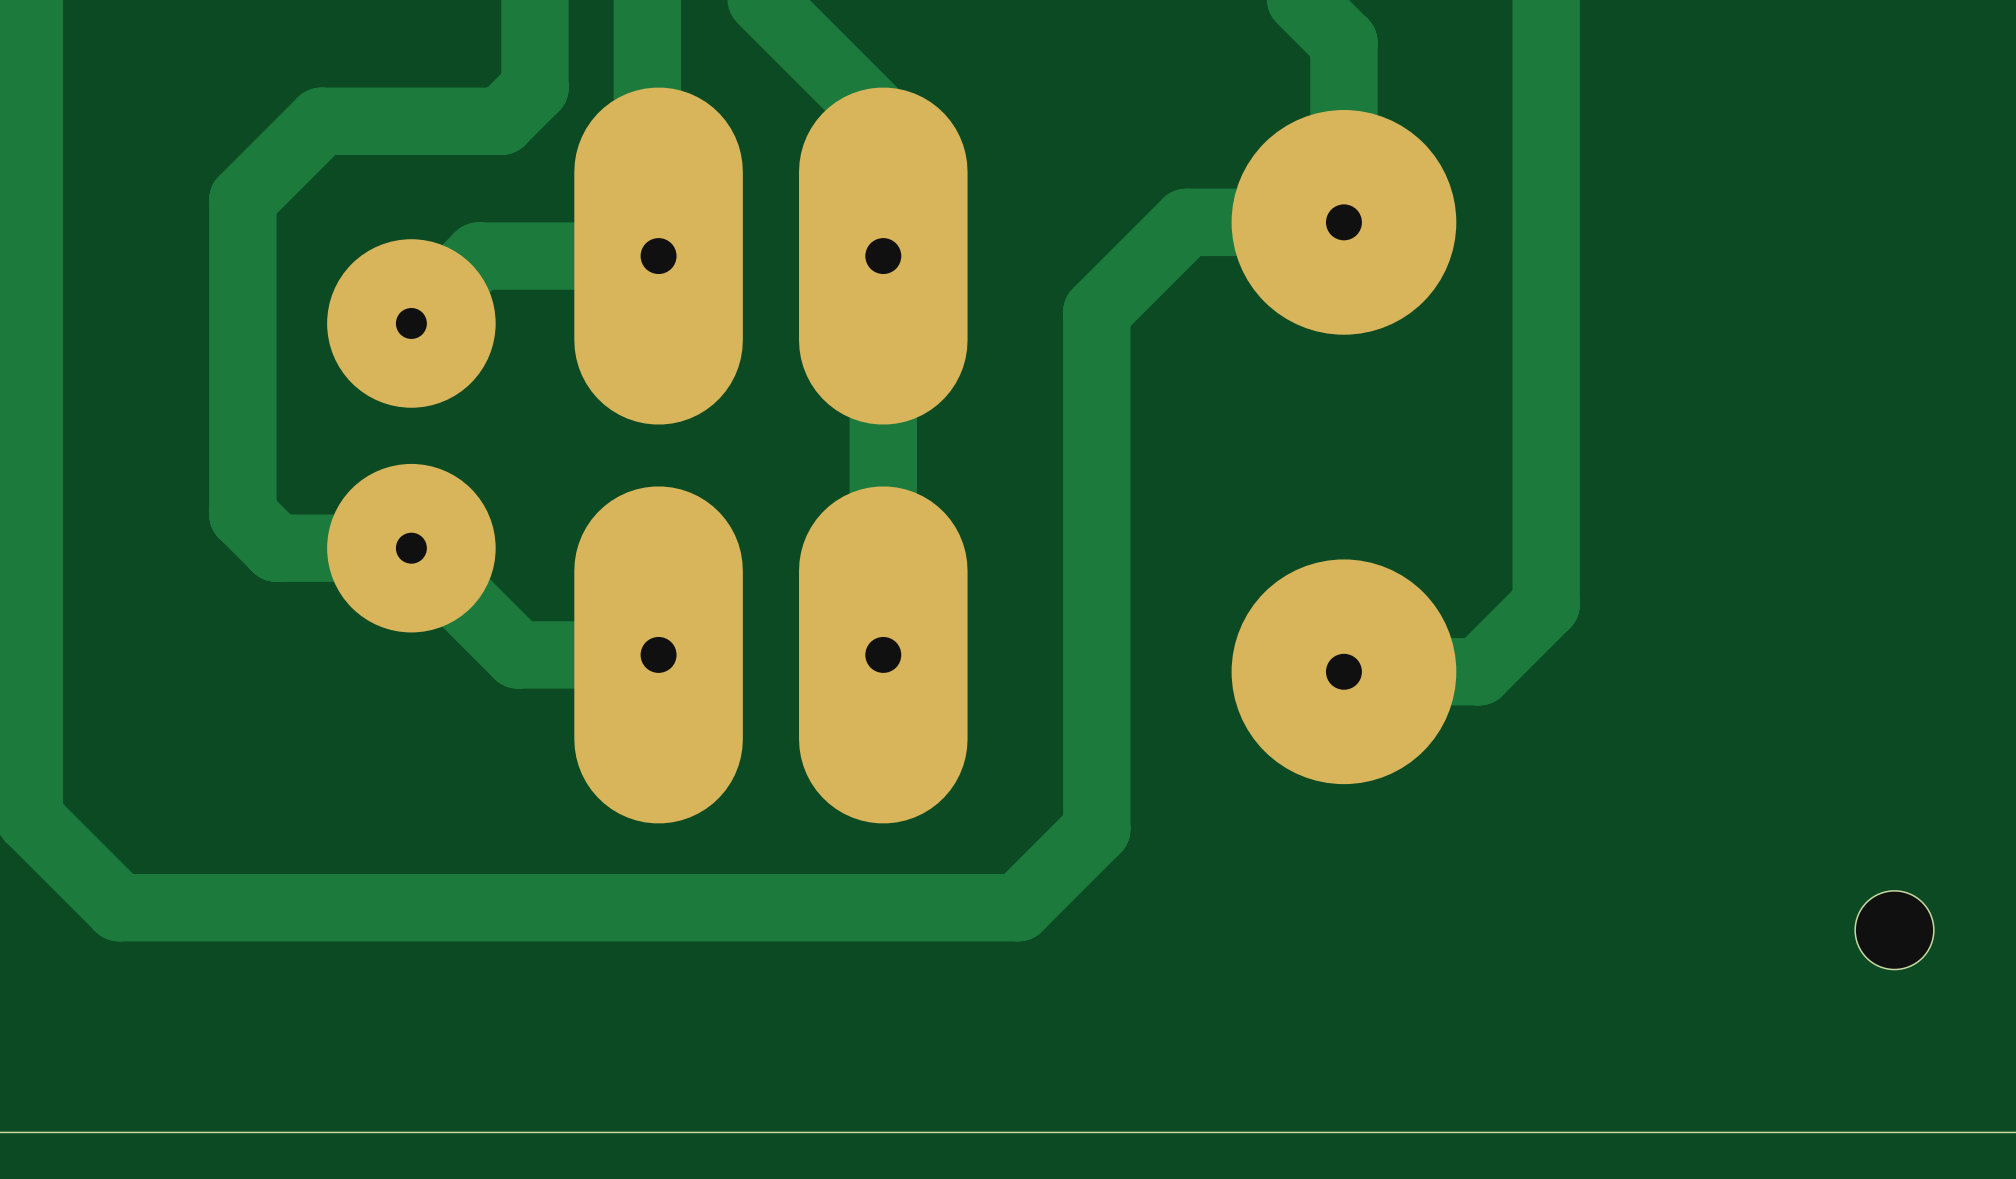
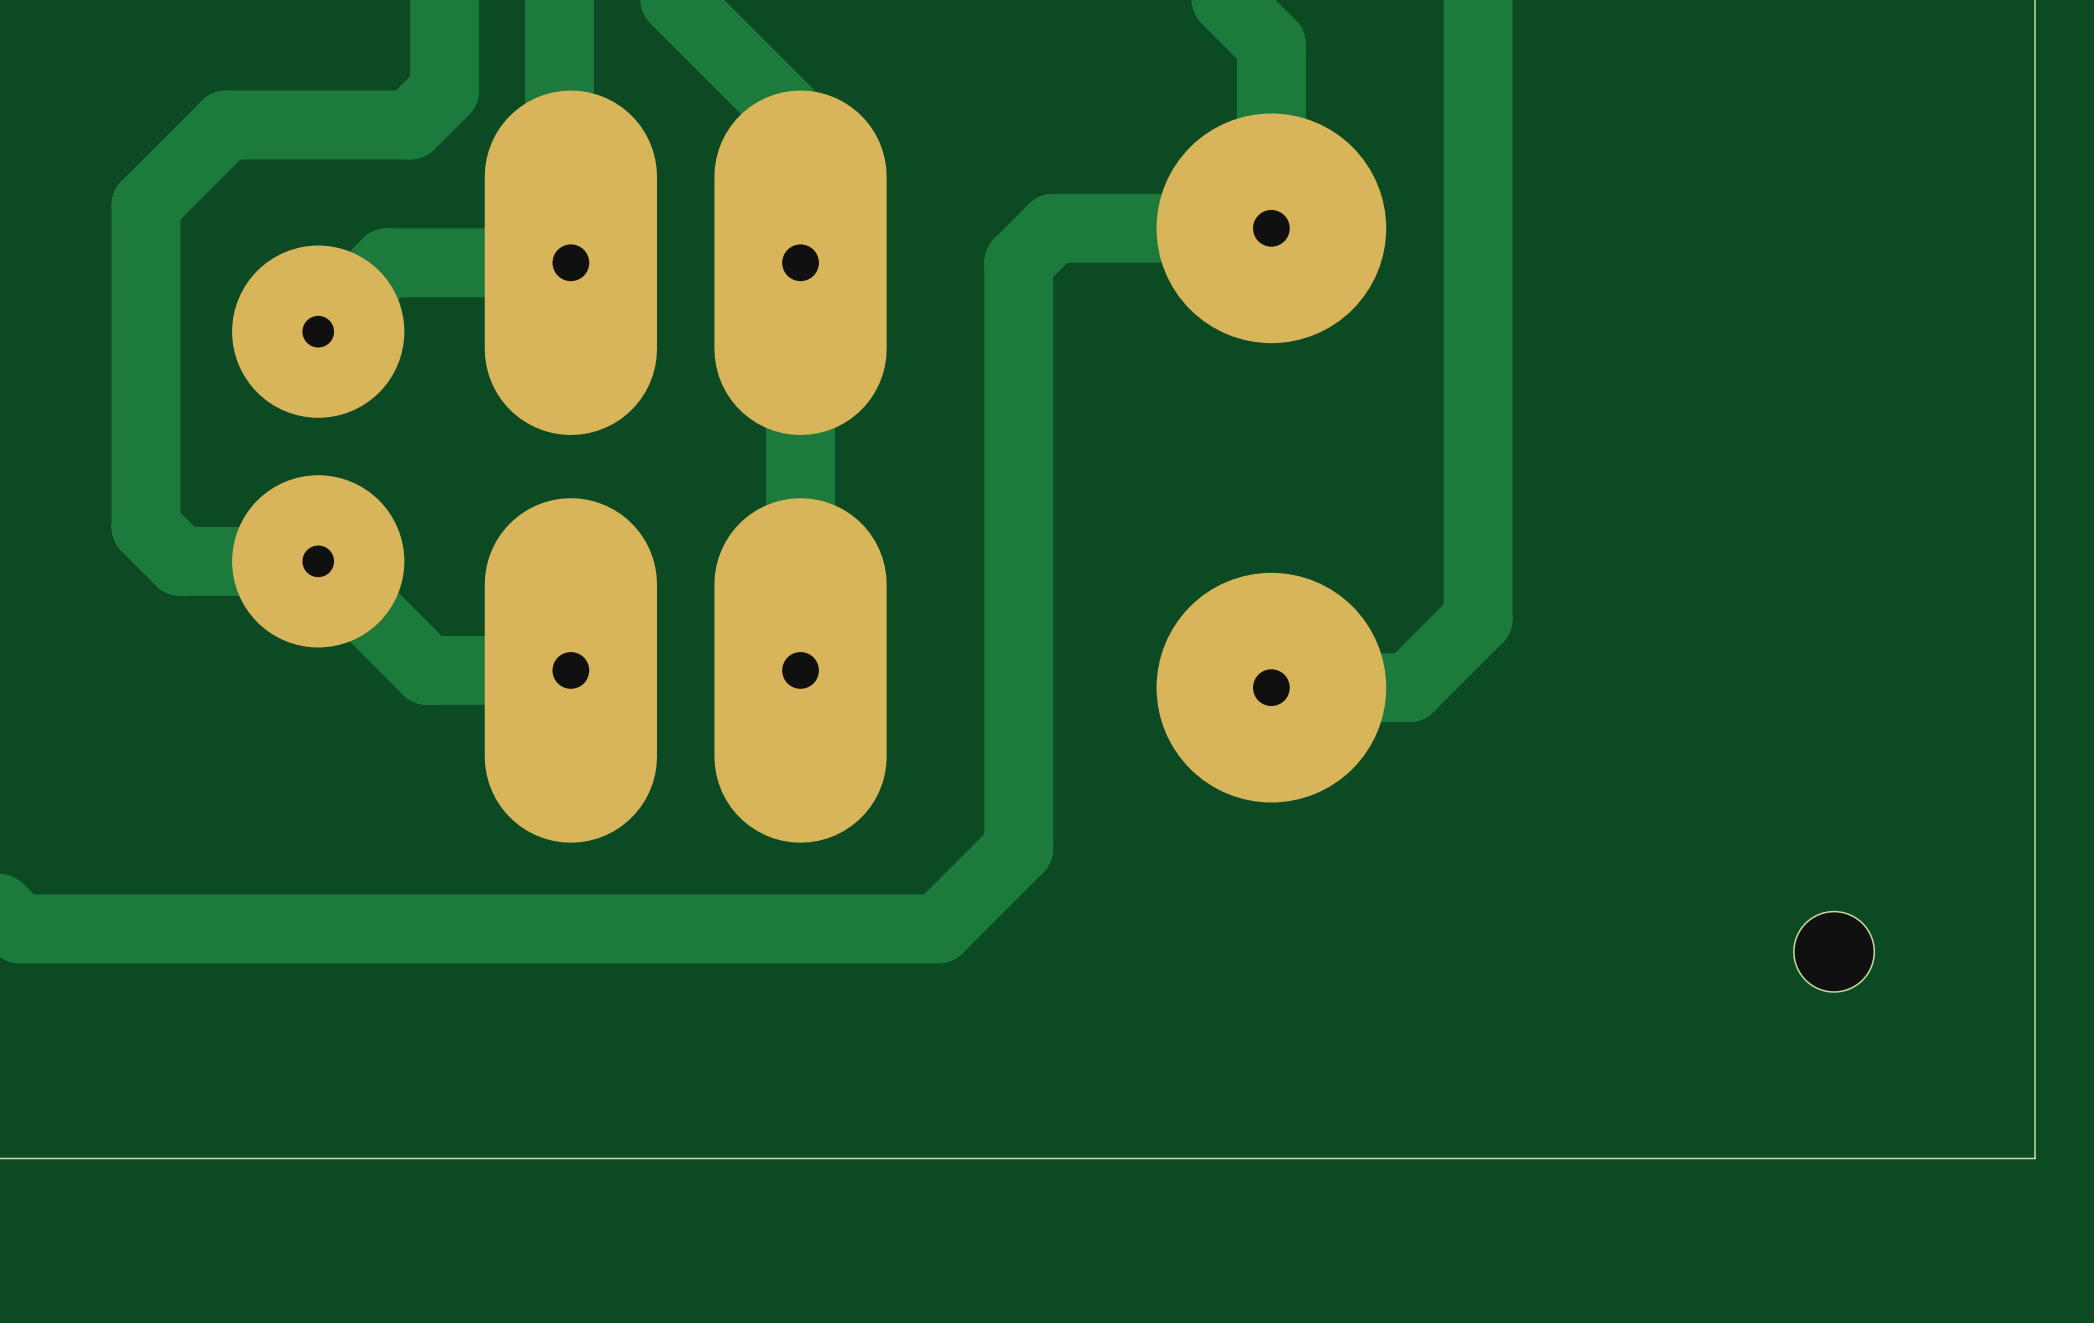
track: (1186, 222) (1096, 312) -> (1110, 228) (1053, 228) (1018, 262) (1018, 320)

